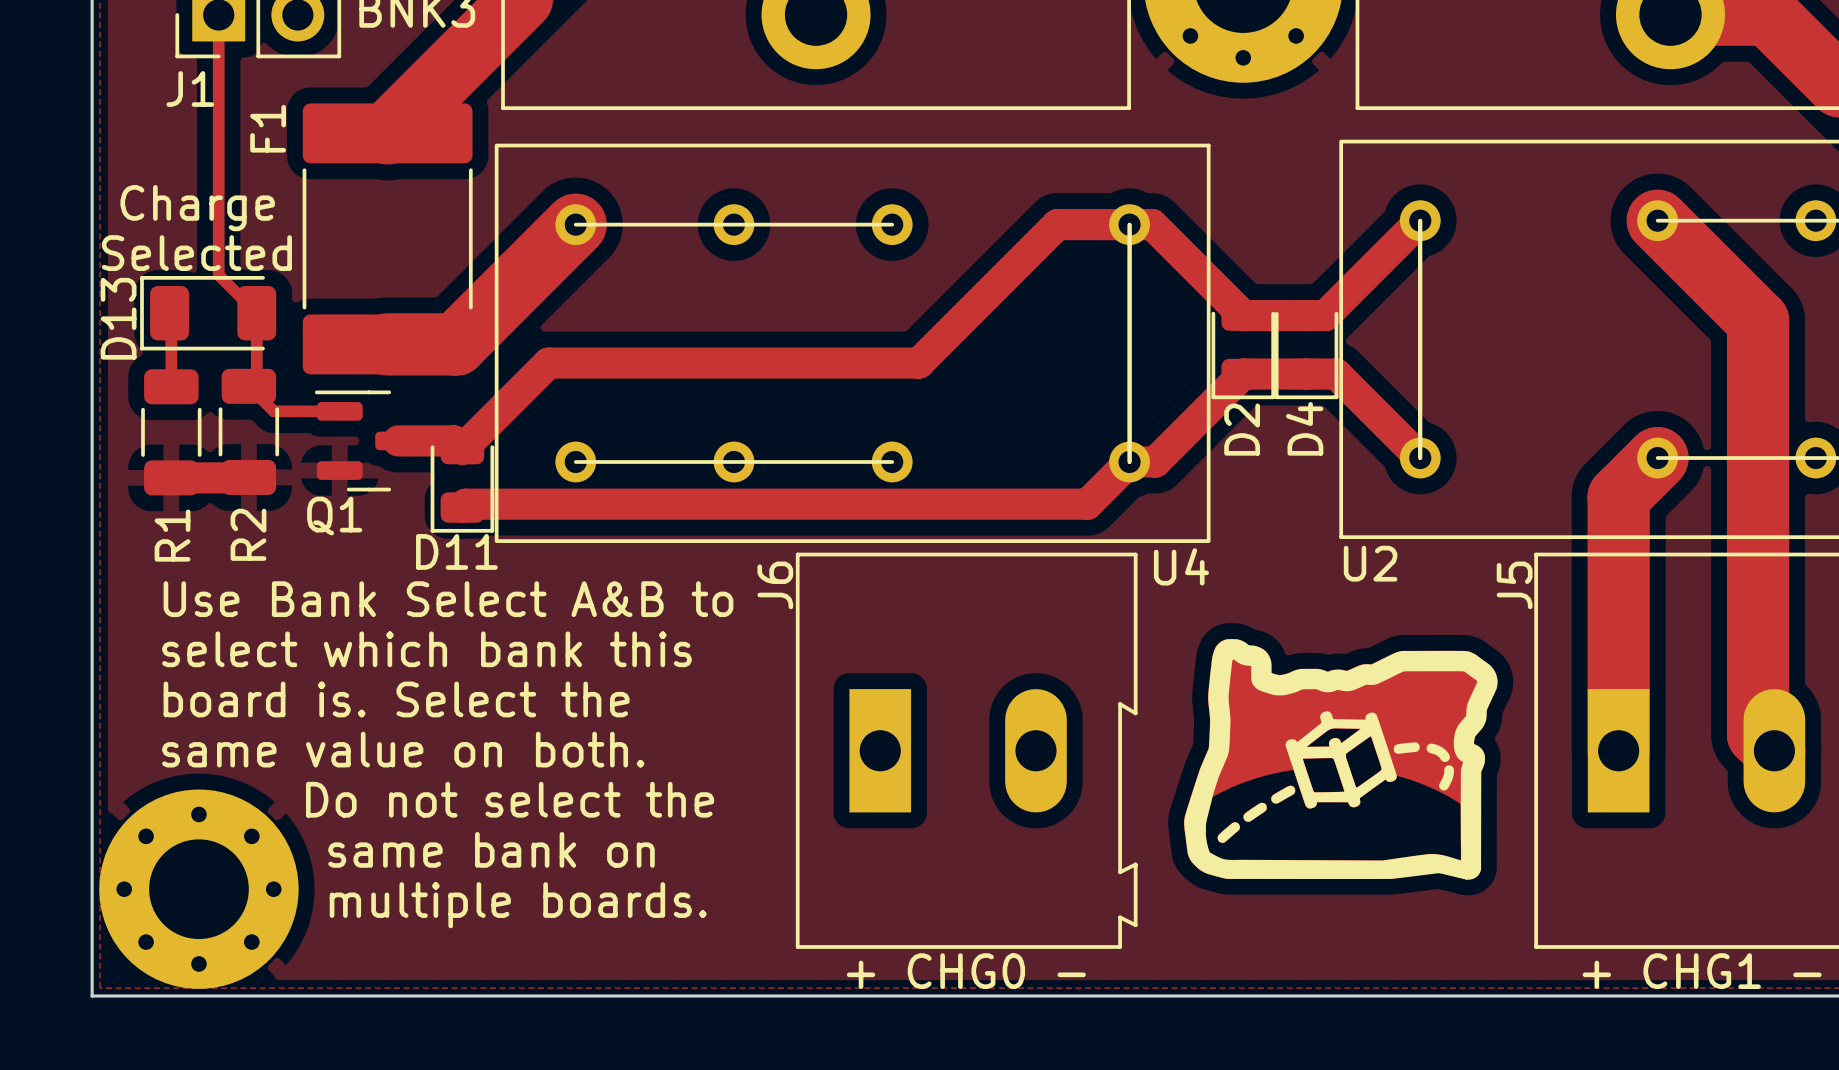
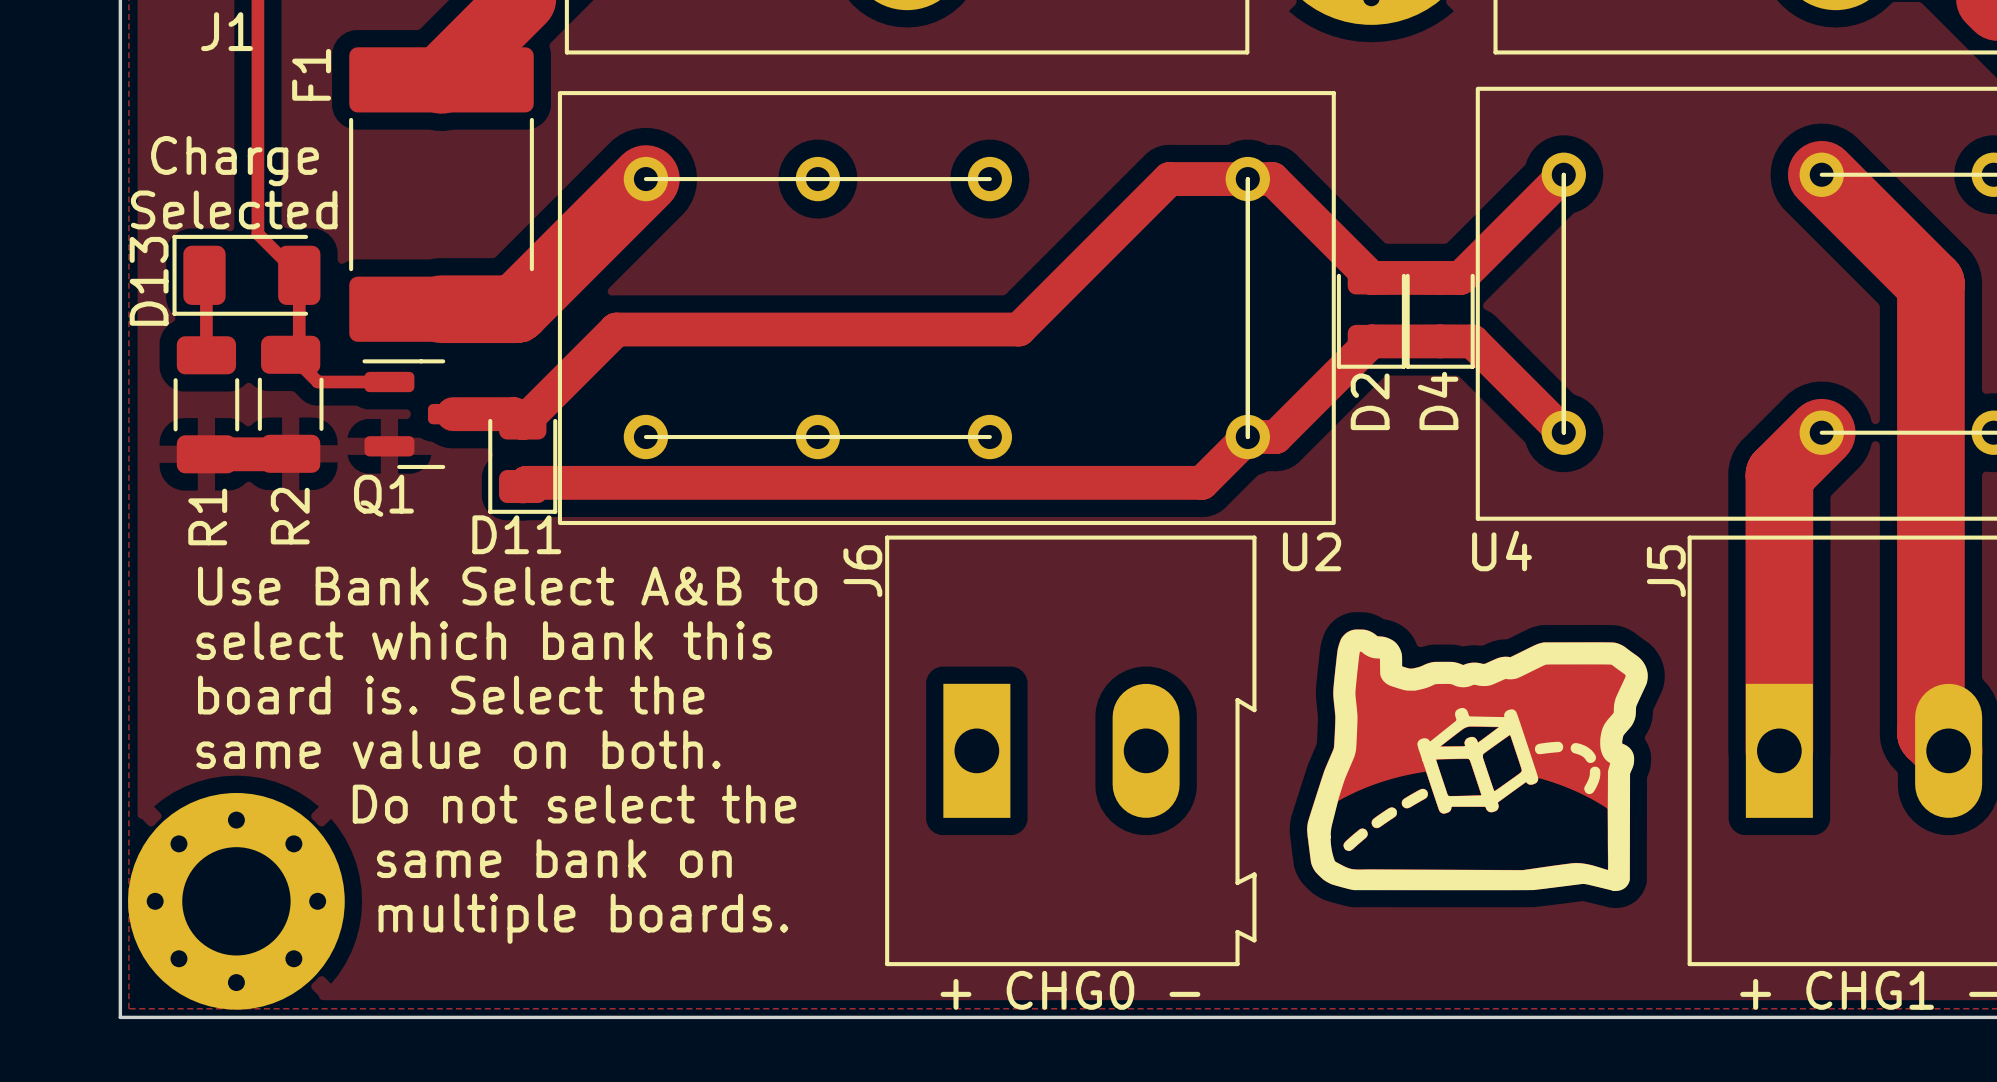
U2 name position: U2 (1370, 563) -> U2 (1312, 551)
U4 name position: U4 (1181, 566) -> U4 (1501, 551)

